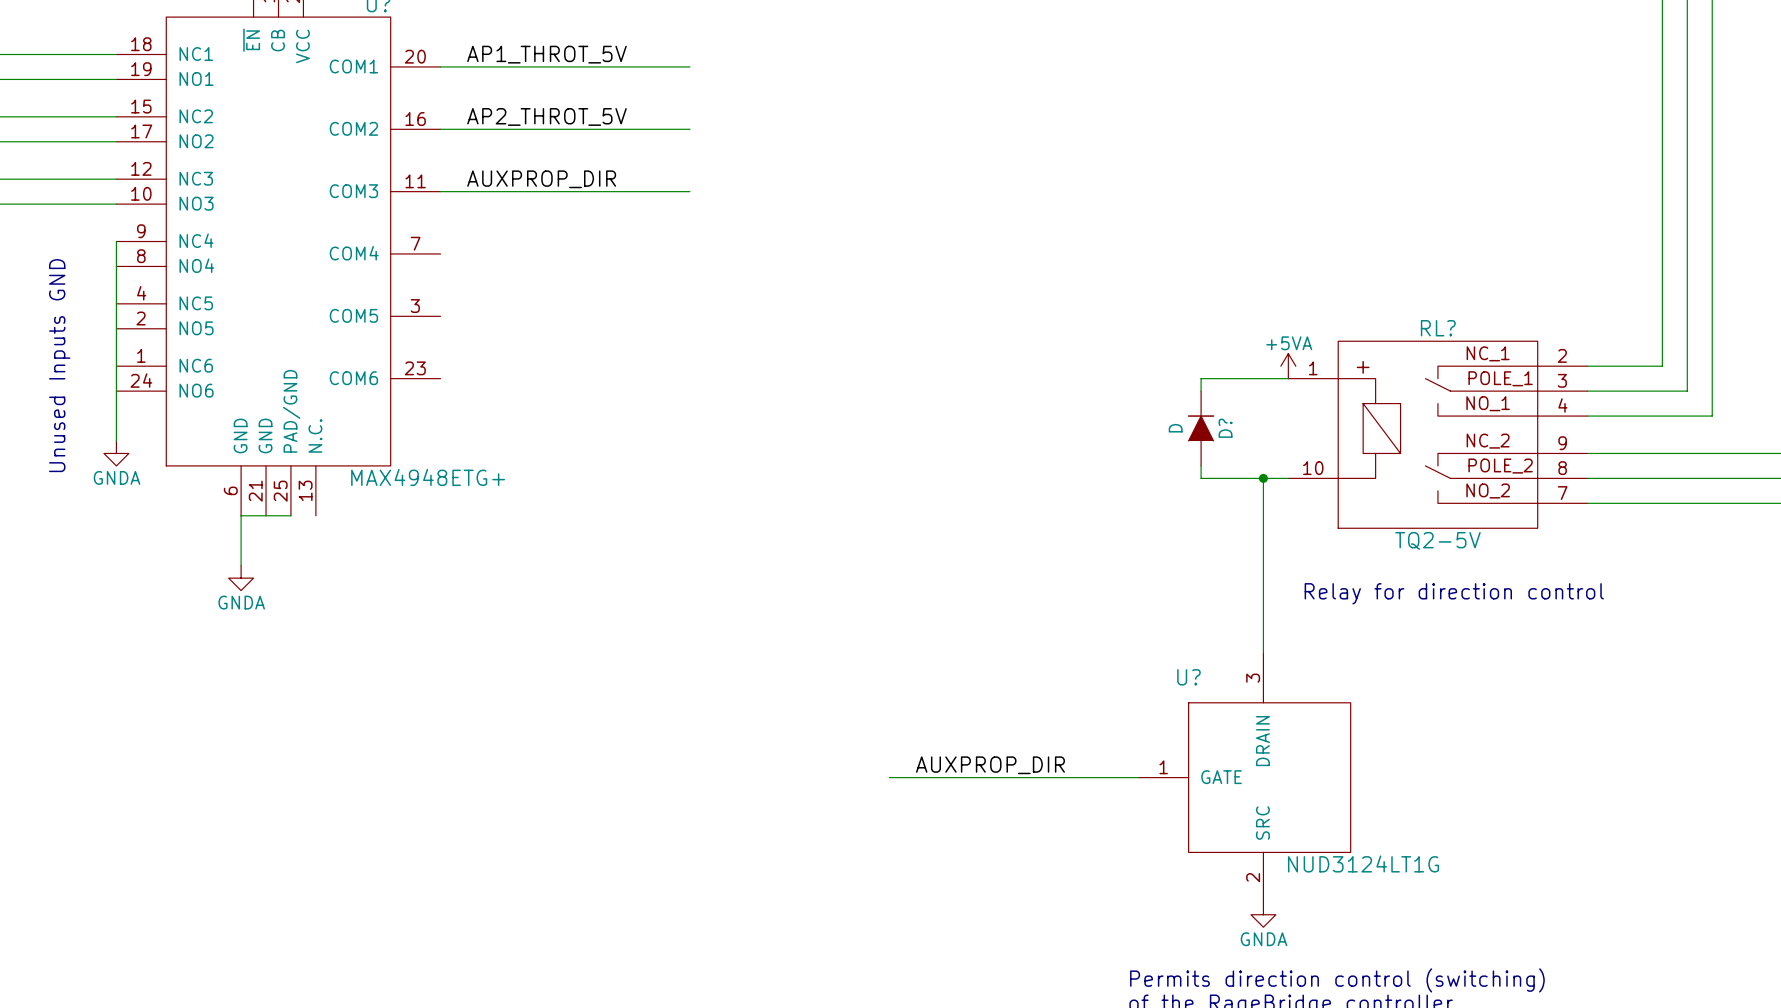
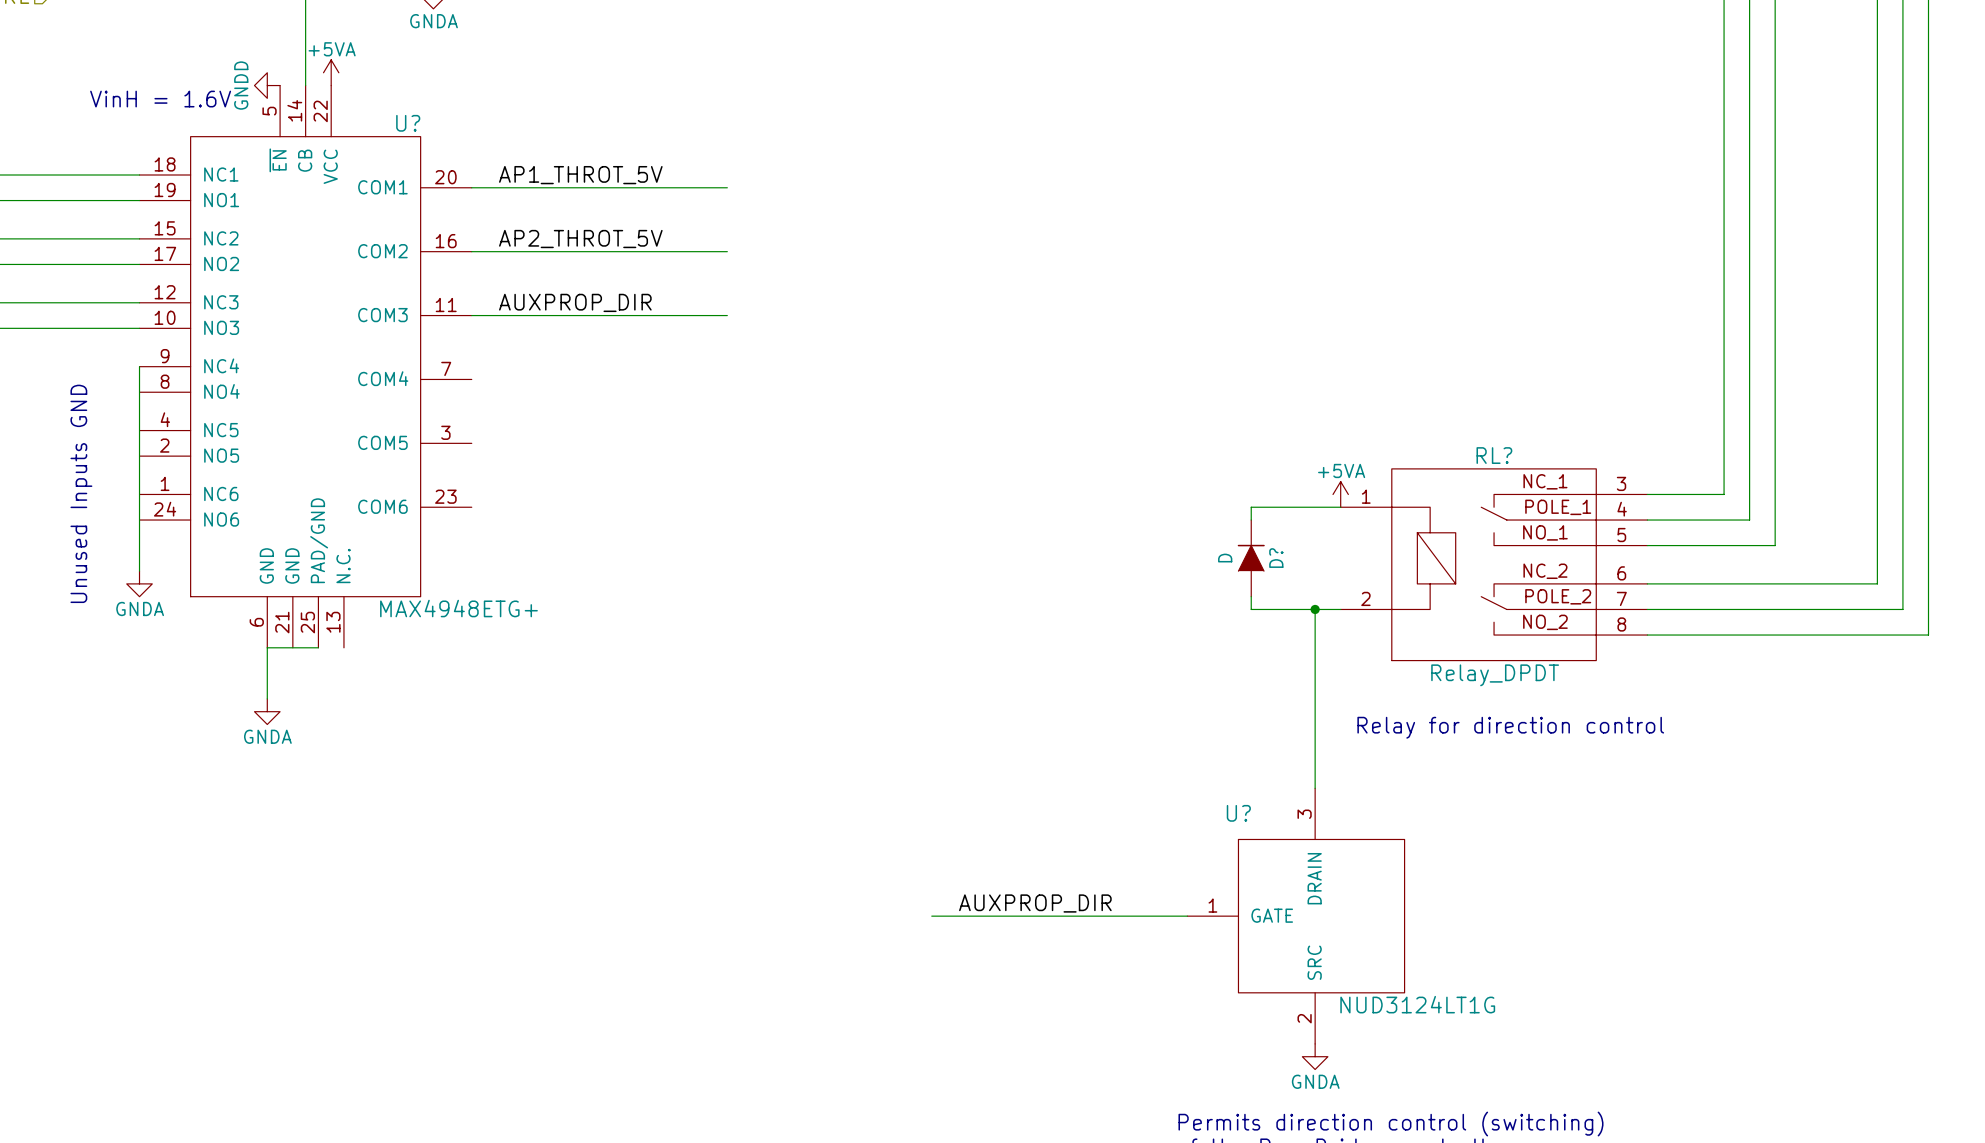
RL? pin number: 2 (1562, 355) -> 3 (1621, 483)
RL? text: + (1363, 367) -> none
RL? pin number: 3 (1562, 380) -> 4 (1622, 509)
RL? pin number: 4 (1562, 405) -> 5 (1621, 535)
RL? pin number: 9 (1562, 443) -> 6 (1621, 573)
RL? pin number: 10 (1313, 468) -> 2 (1365, 598)
RL? pin number: 8 (1562, 468) -> 7 (1621, 598)
RL? pin number: 7 (1562, 493) -> 8 (1621, 624)
RL? value: TQ2-5V (1437, 540) -> Relay_DPDT (1495, 675)

